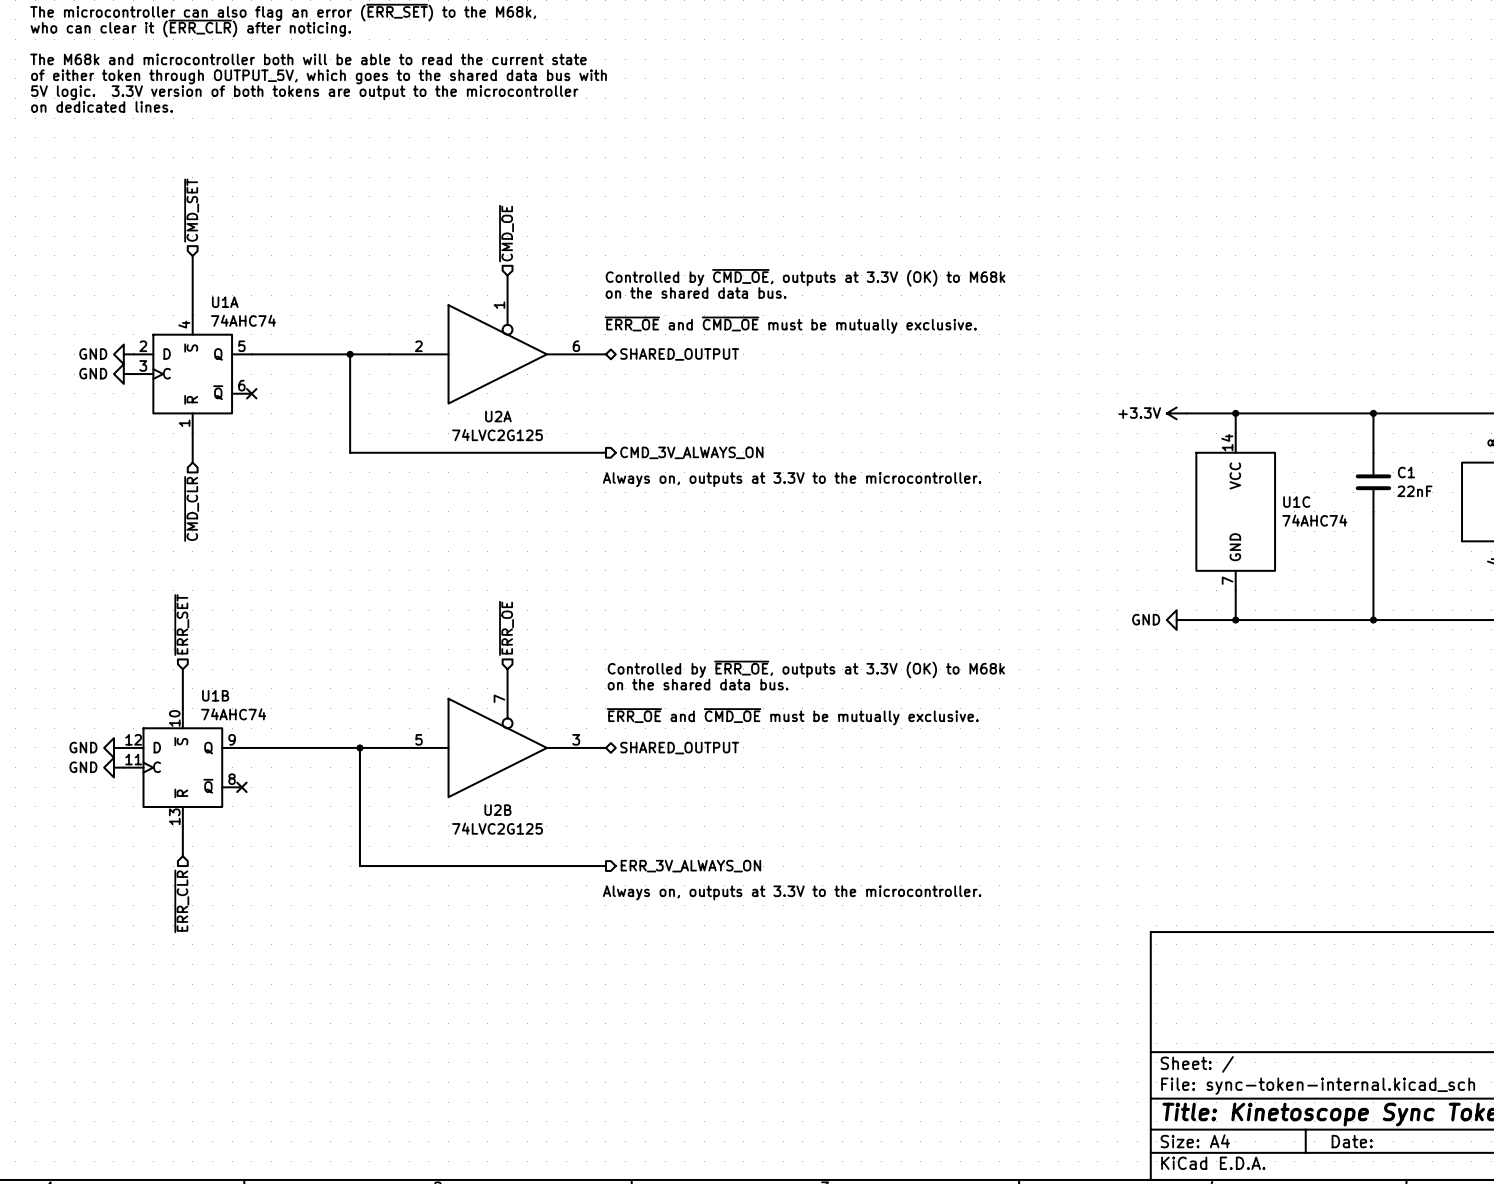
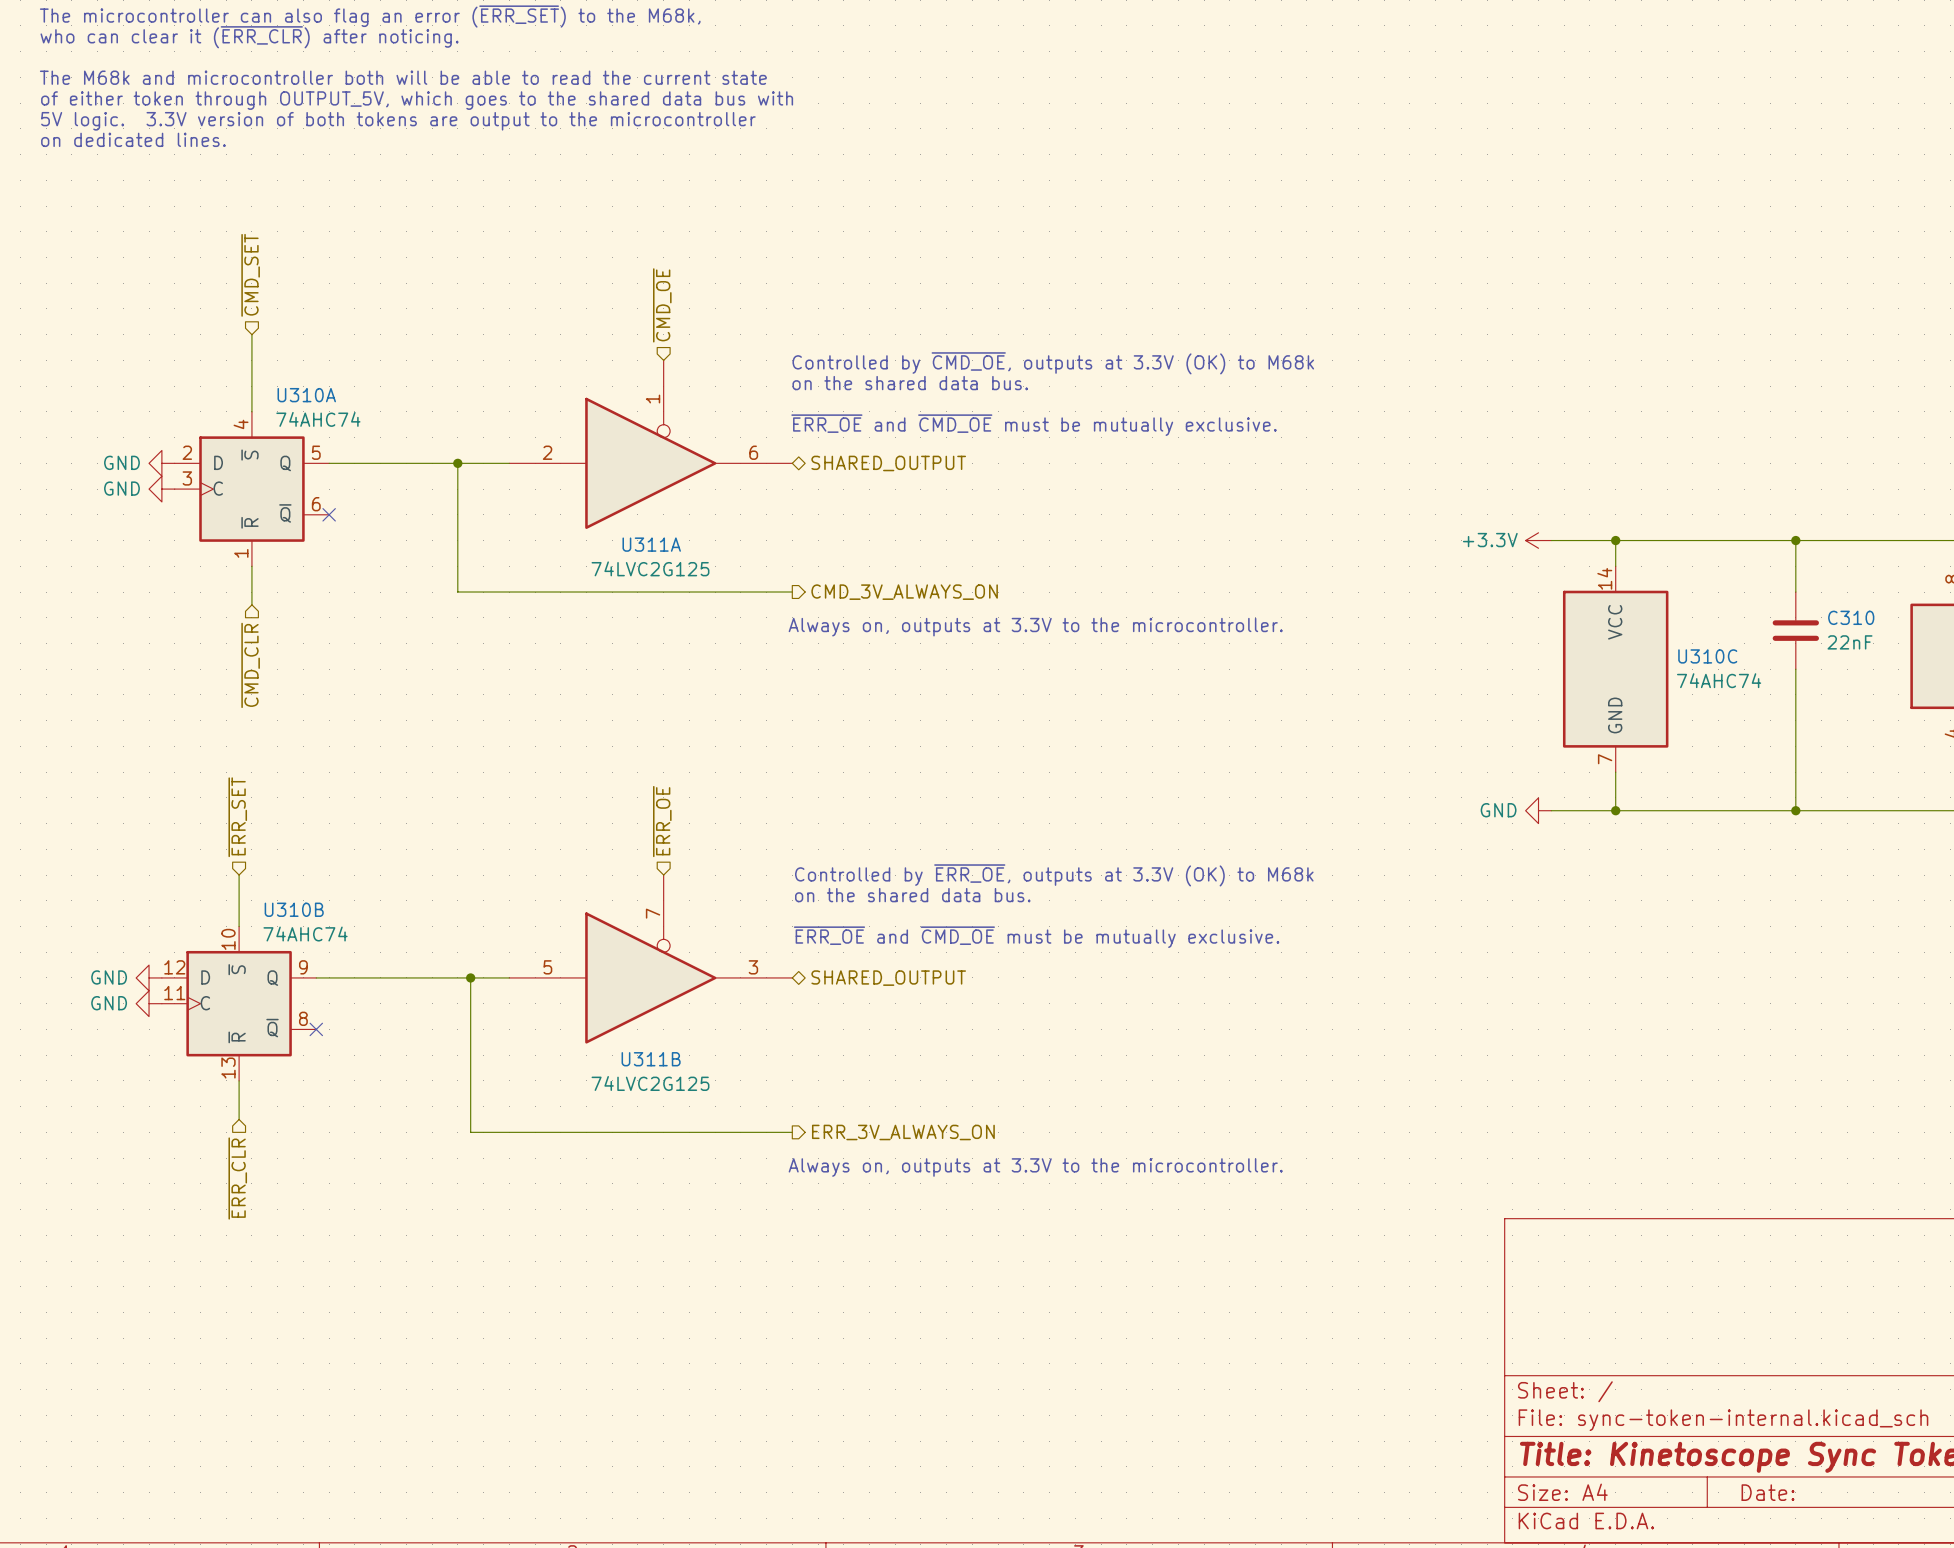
U1A name: U1A (225, 302) -> U310A (306, 395)
U2A name: U2A (498, 416) -> U311A (651, 544)
C1 name: C1 (1406, 472) -> C310 (1851, 617)
U1C name: U1C (1296, 502) -> U310C (1707, 656)
U1B name: U1B (215, 695) -> U310B (294, 909)
U2B name: U2B (497, 810) -> U311B (651, 1059)

